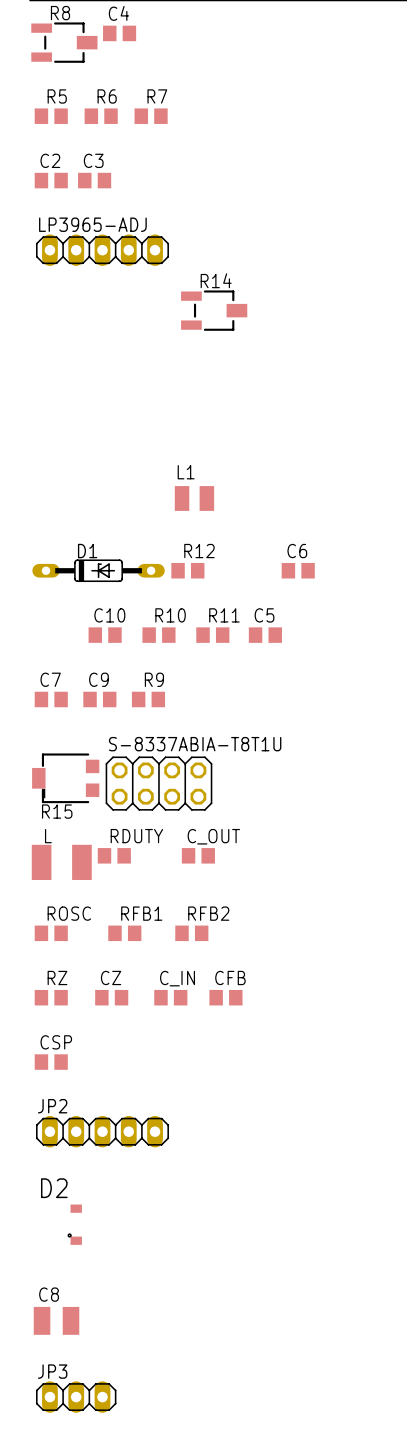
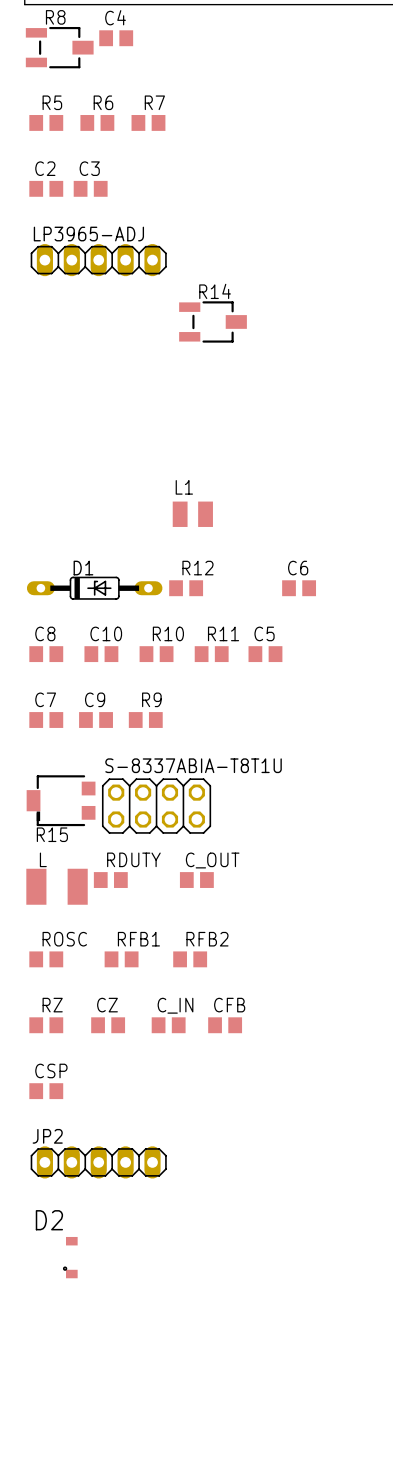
C8 footprint: [33, 1306, 80, 1335] -> [29, 646, 64, 663]
JP3: (76, 1397) -> none

